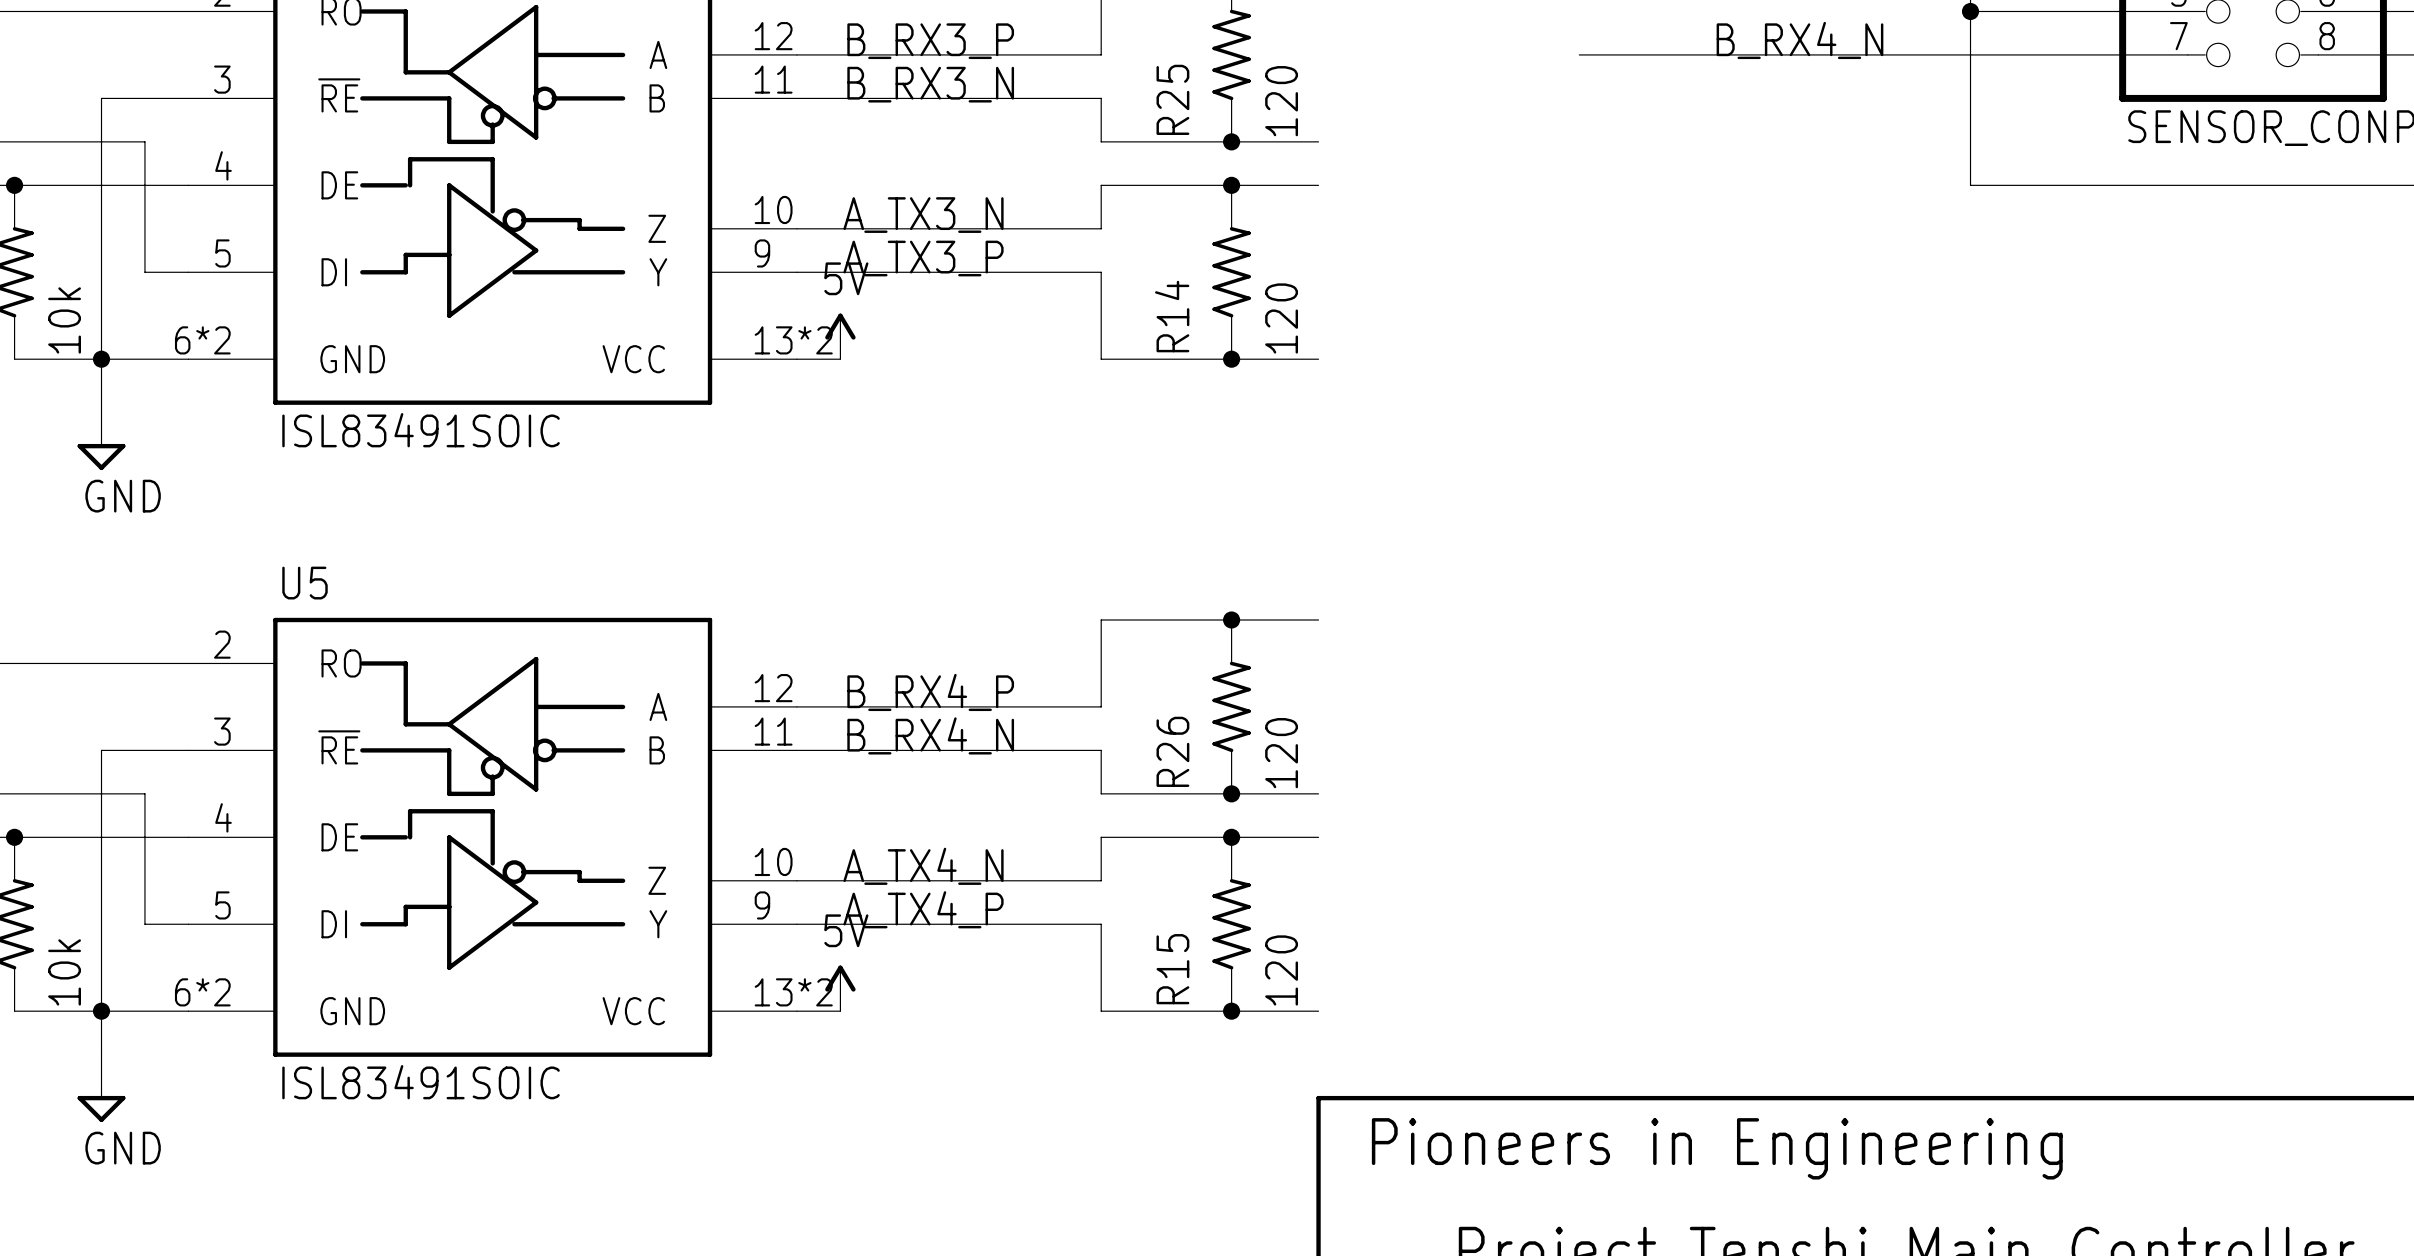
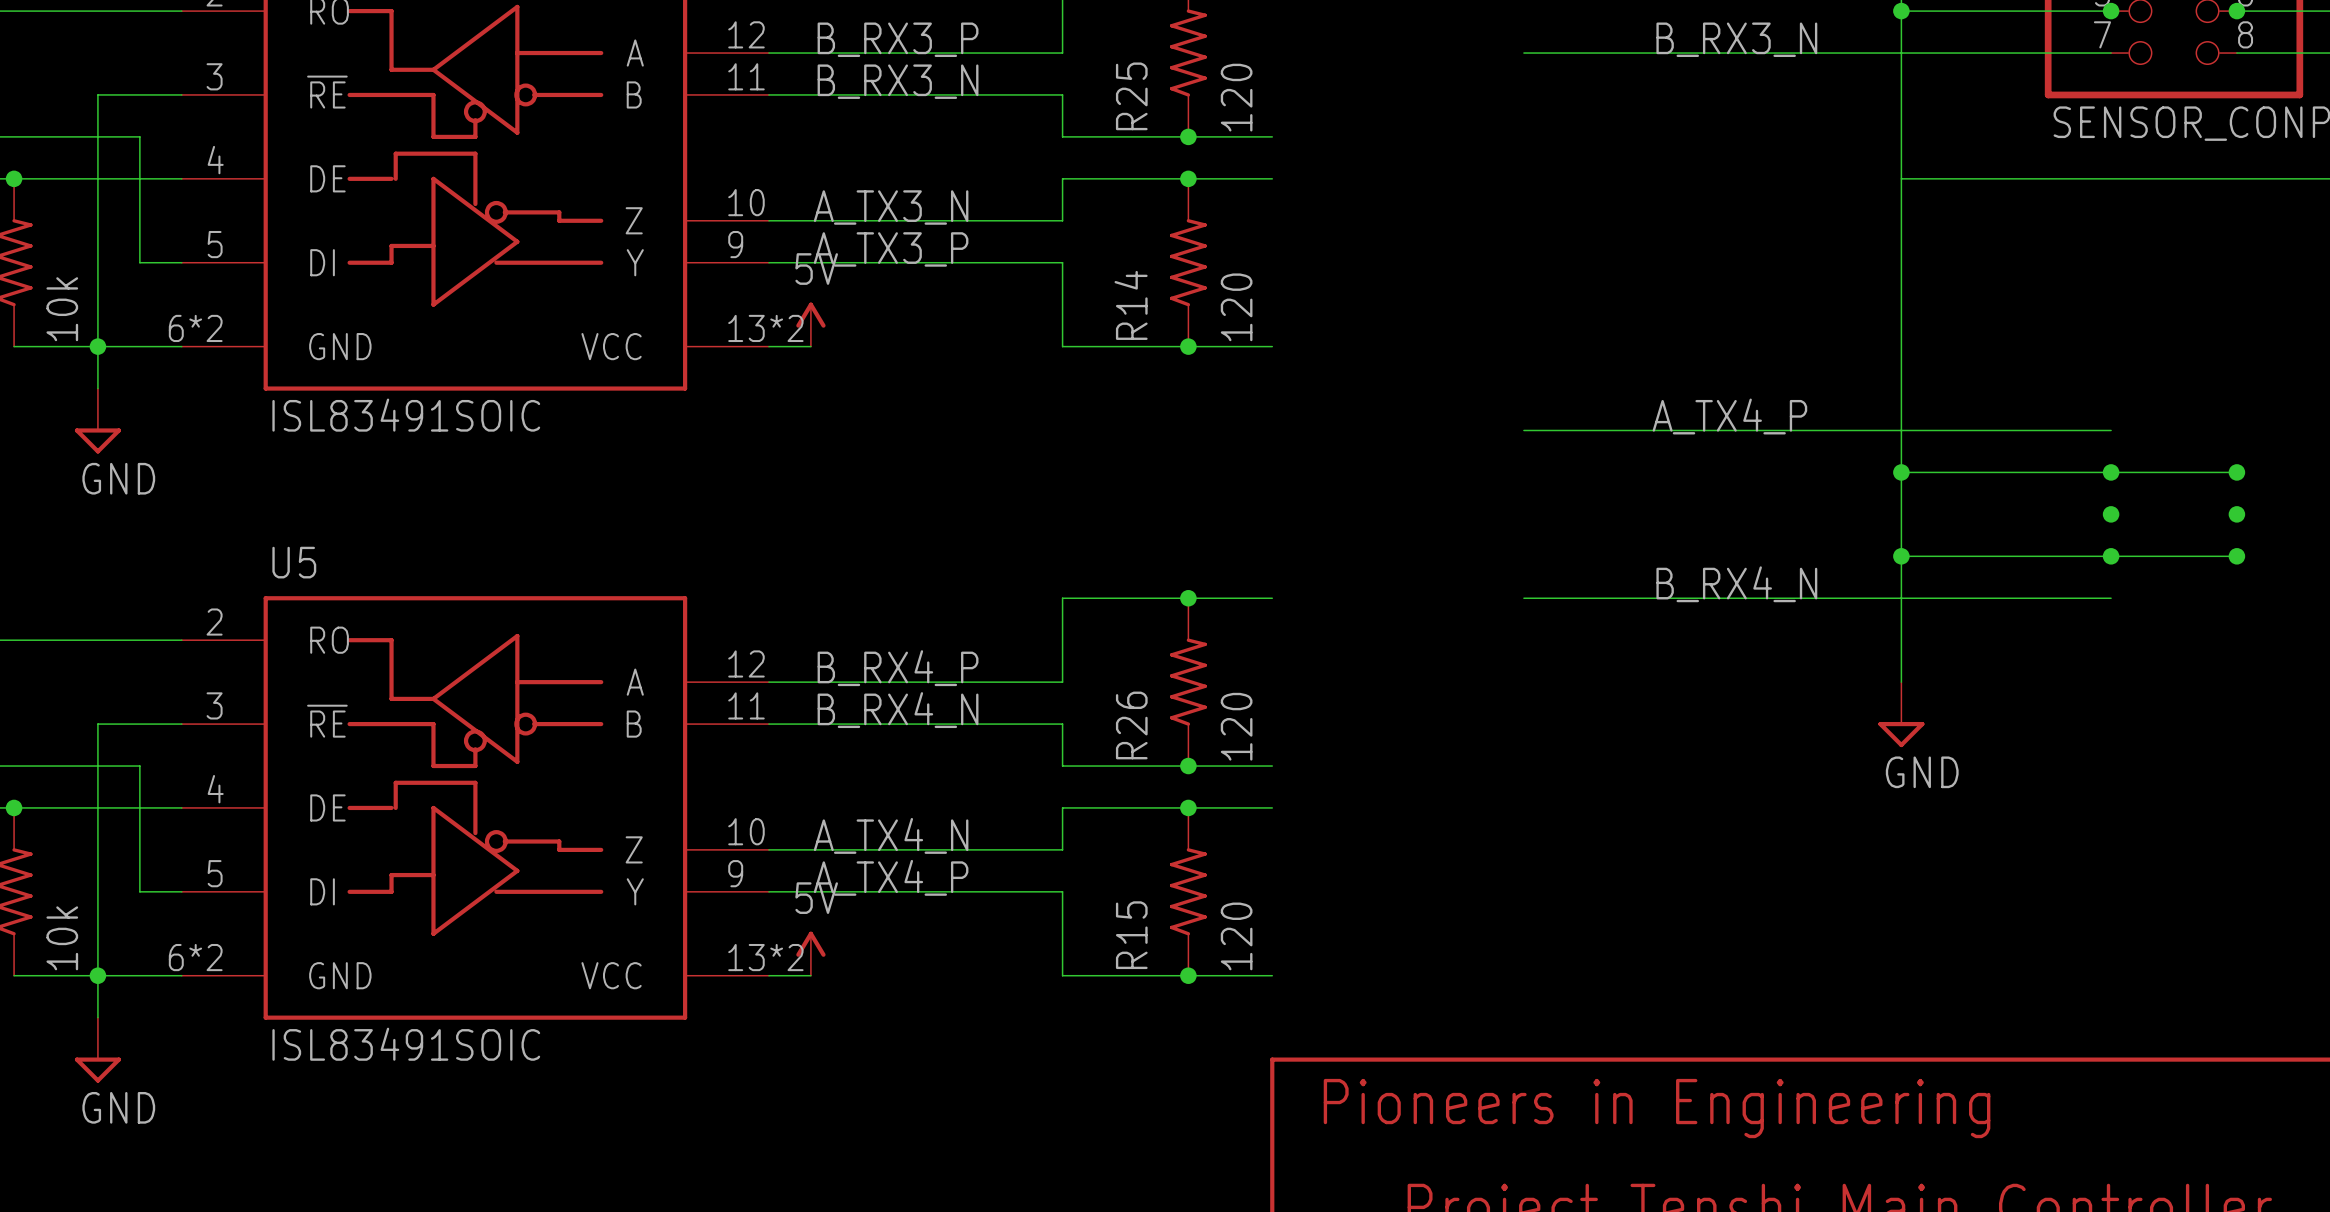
junction: none -> (2111, 11)
junction: none -> (2236, 11)
label: B_RX4_N (1799, 40) -> B_RX3_N (1736, 39)
wire: none -> (1901, 178) (1901, 682)
label: none -> A_TX4_P (1729, 416)
wire: none -> (1523, 430) (2111, 430)
wire: none -> (1901, 472) (2236, 472)
junction: none -> (1901, 472)
junction: none -> (2111, 472)
junction: none -> (2236, 472)
junction: none -> (2111, 514)
junction: none -> (2236, 514)
wire: none -> (1901, 556) (2236, 556)
junction: none -> (1901, 556)
junction: none -> (2111, 556)
junction: none -> (2236, 556)
label: none -> B_RX4_N (1736, 584)
wire: none -> (1523, 598) (2111, 598)
power symbol: none -> GND (1901, 714)

